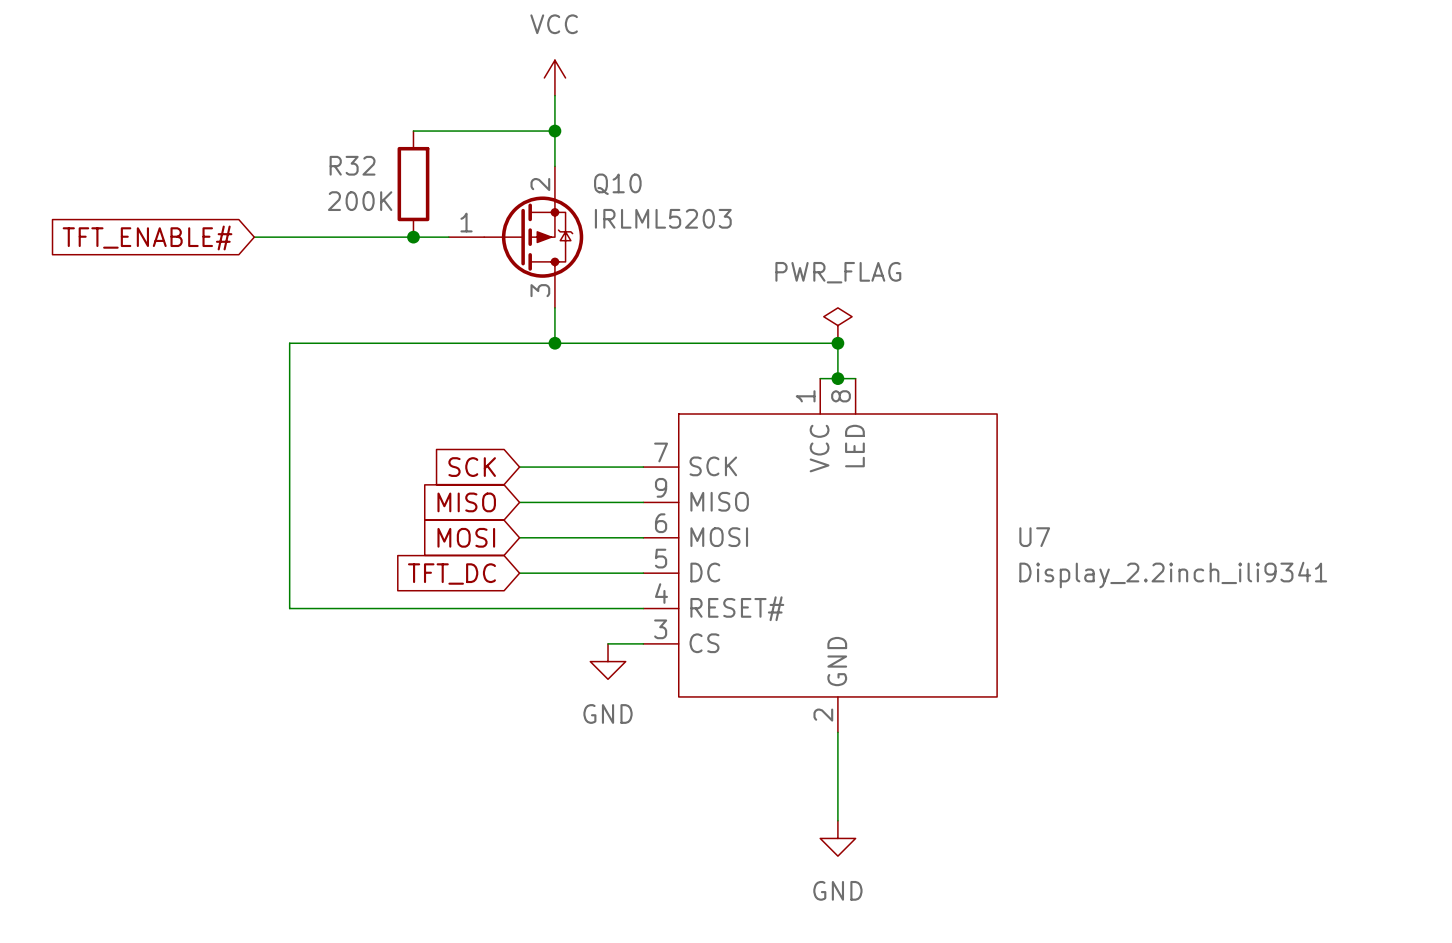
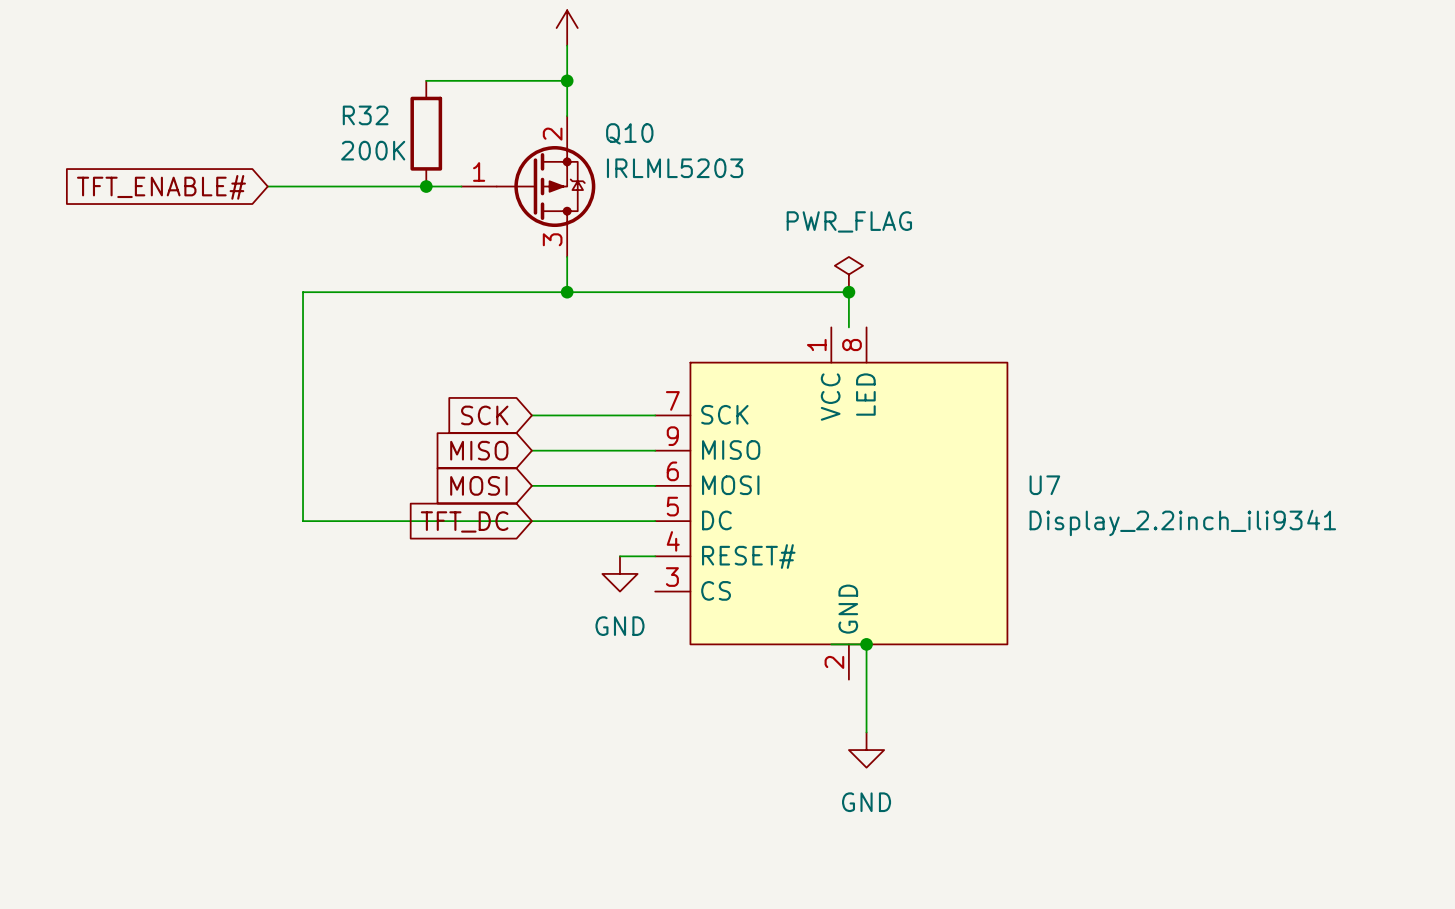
wire: (820, 378) (855, 378) -> none
junction: (837, 378) -> none
wire: (289, 573) (289, 608) (608, 608) -> (303, 521) (531, 521)
wire: (608, 643) (643, 643) -> none
power symbol position: GND (608, 661) -> GND (620, 573)
wire: none -> (831, 644) (866, 644) (866, 732)
junction: none -> (866, 644)
wire: (837, 732) (837, 820) -> none
power symbol position: GND (837, 838) -> GND (866, 750)

